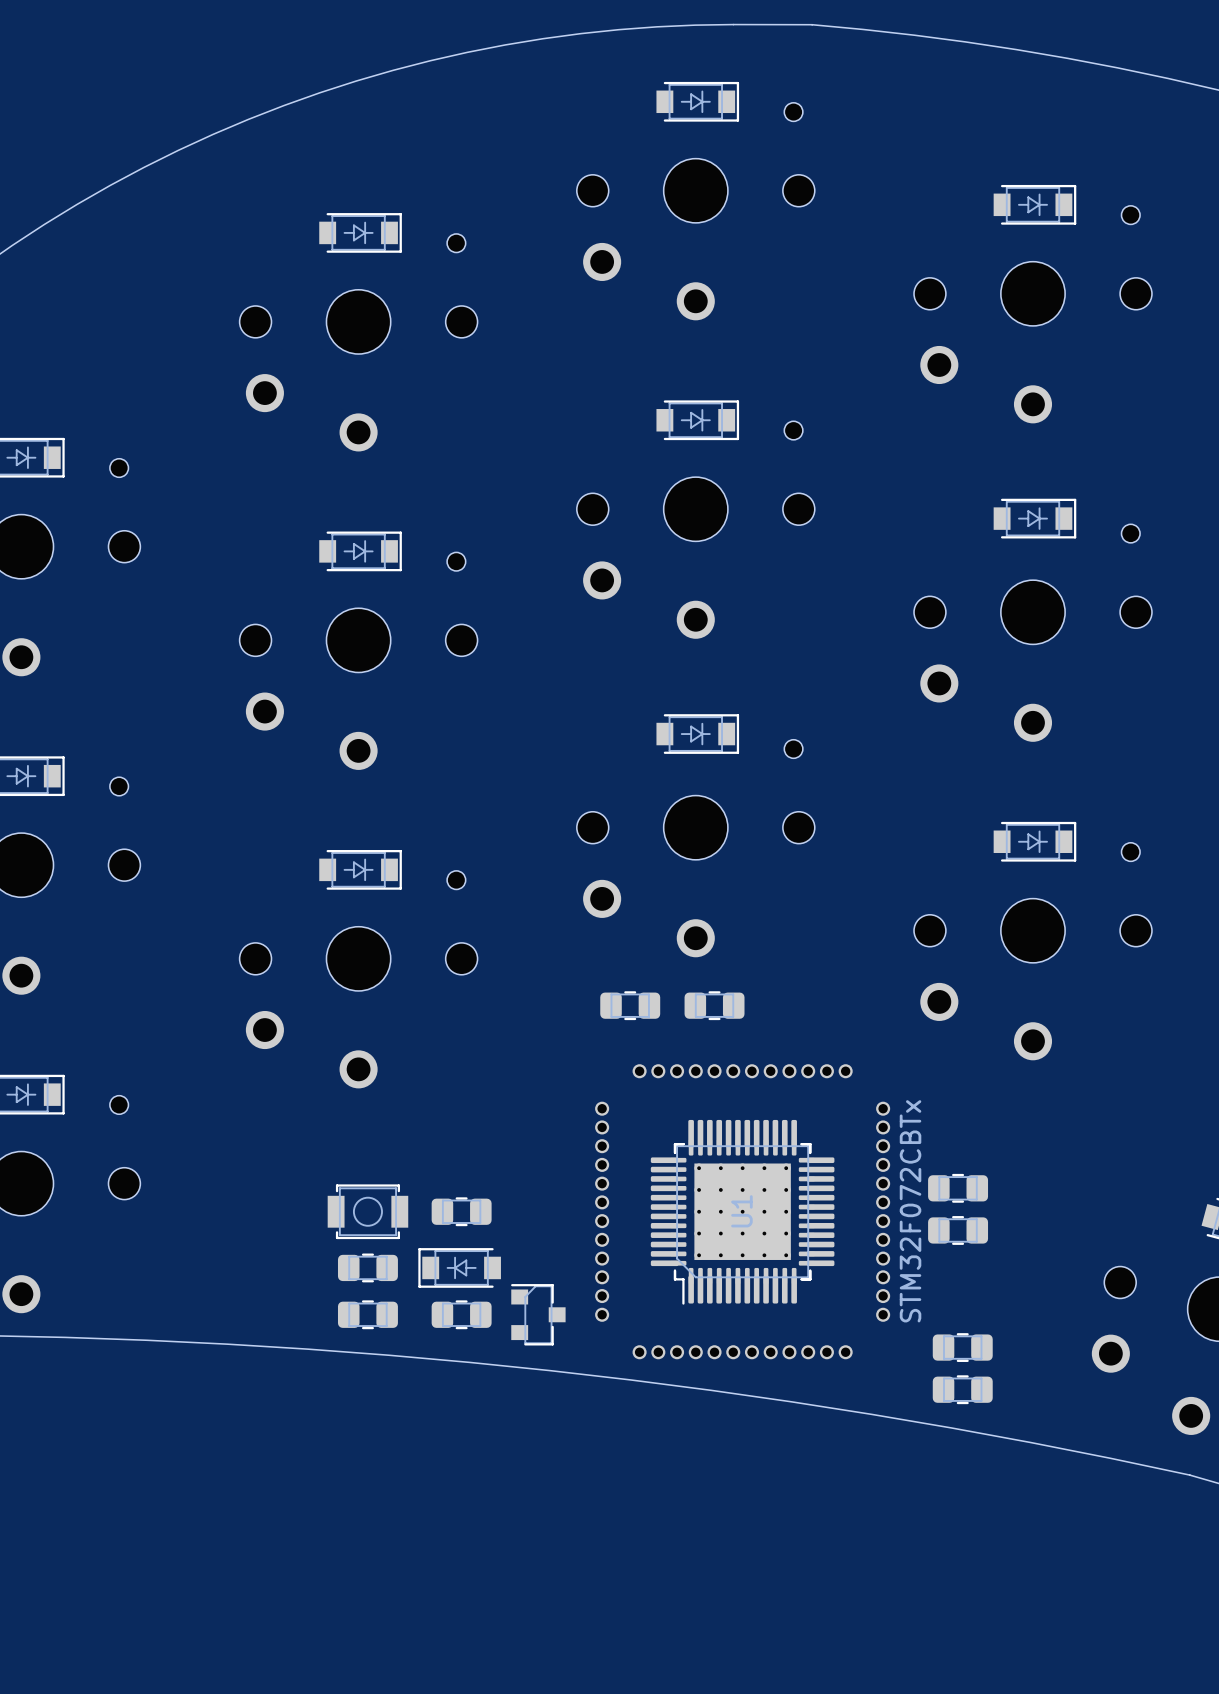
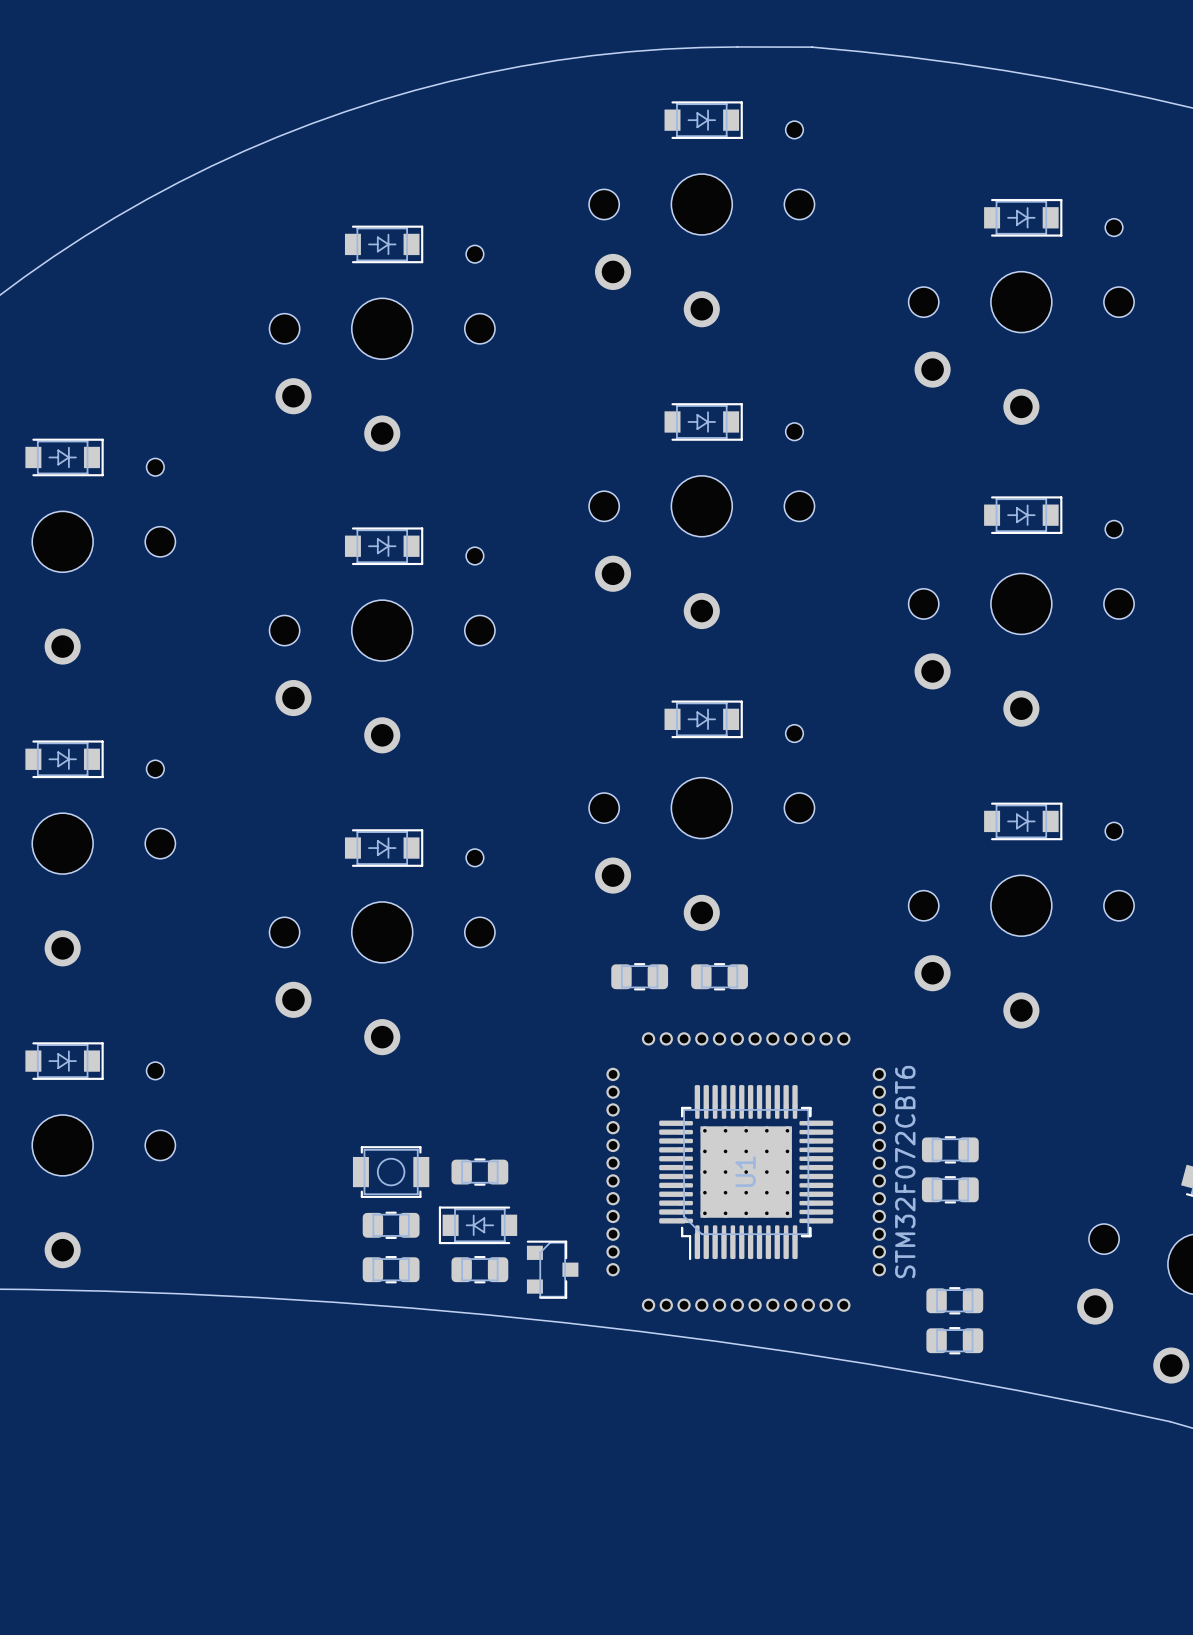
part value: STM32F072CBTx (910, 1211) -> STM32F072CBT6 (905, 1172)

